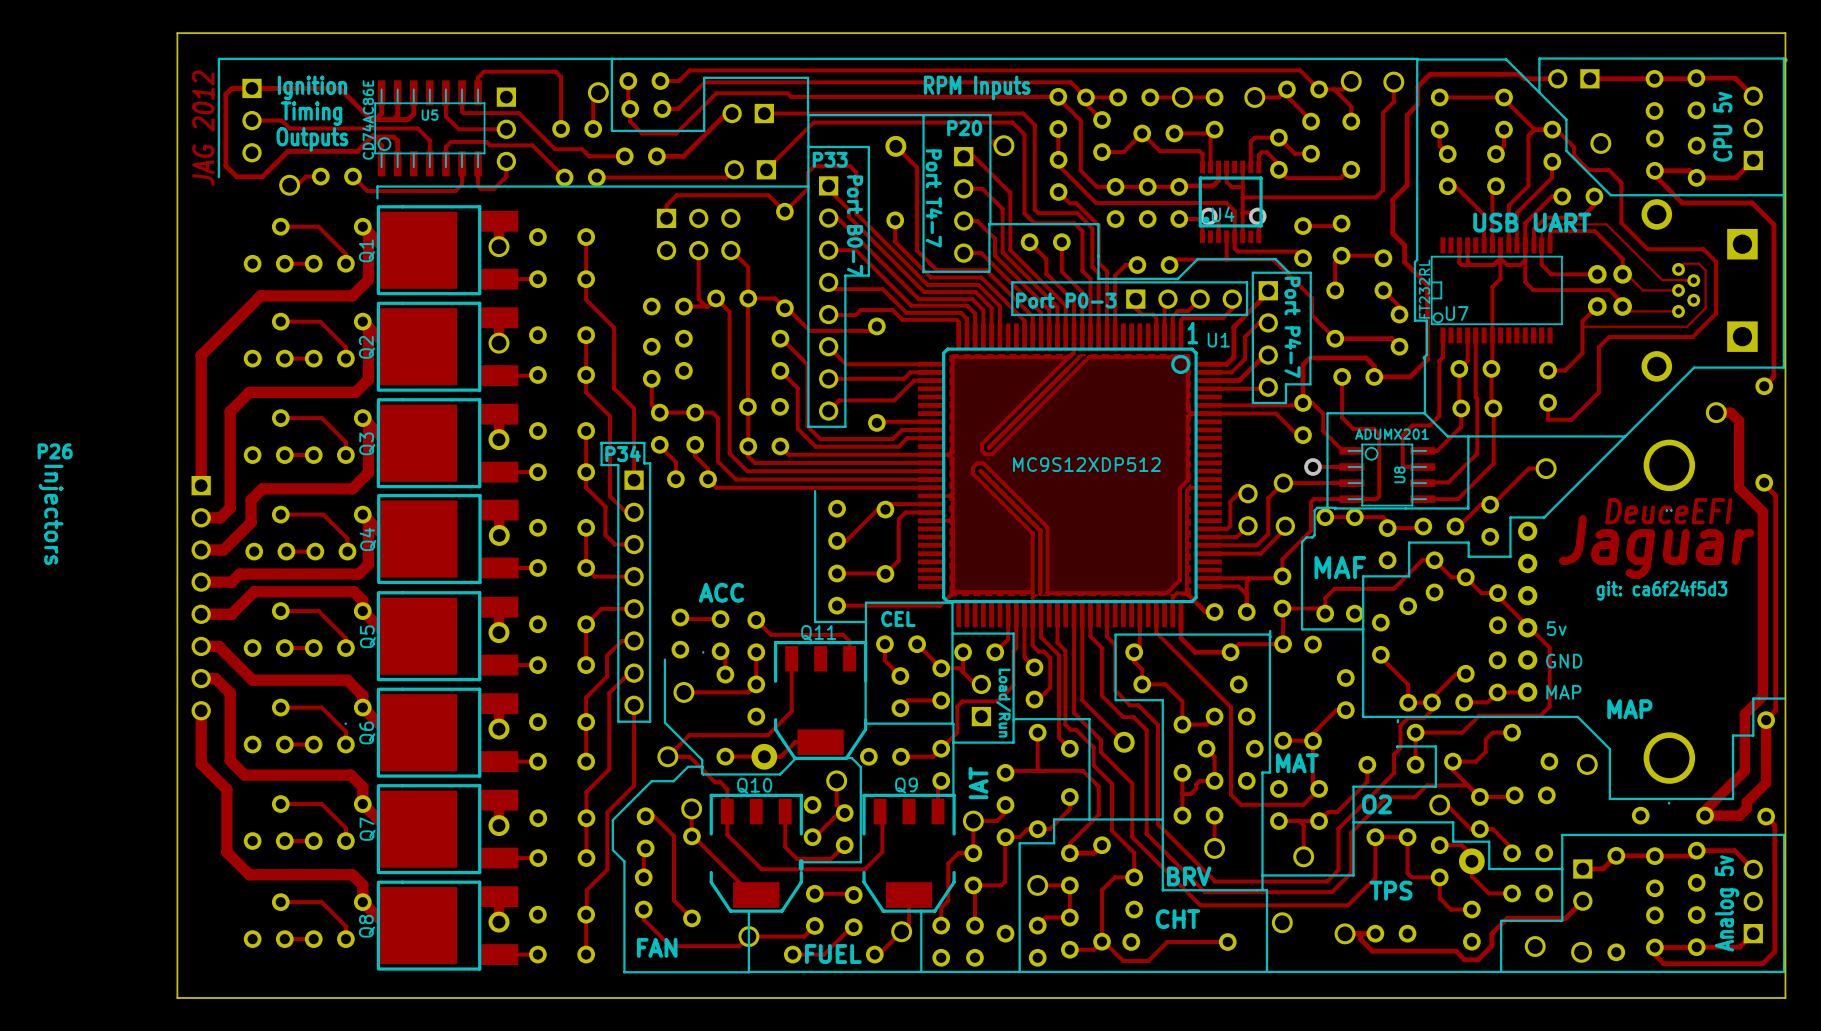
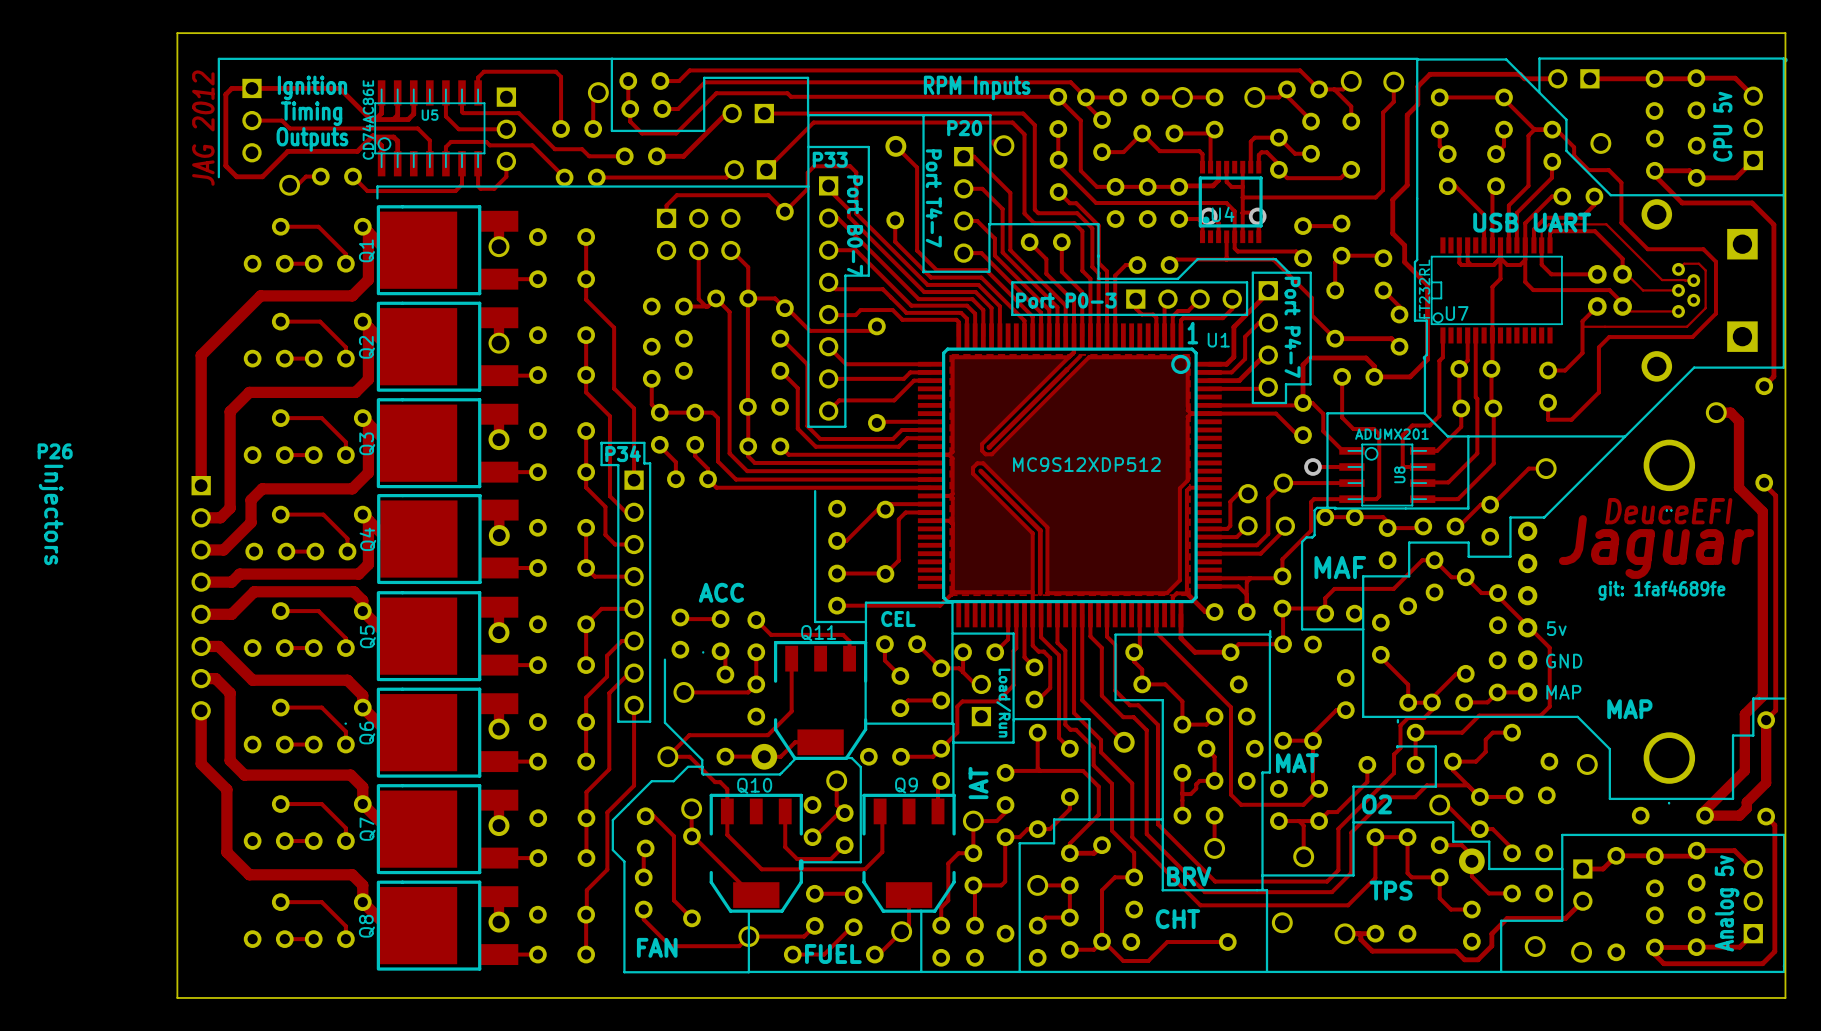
text: git: ca6f24f5d3 (1661, 590) -> git: 1faf4689fe (1661, 590)

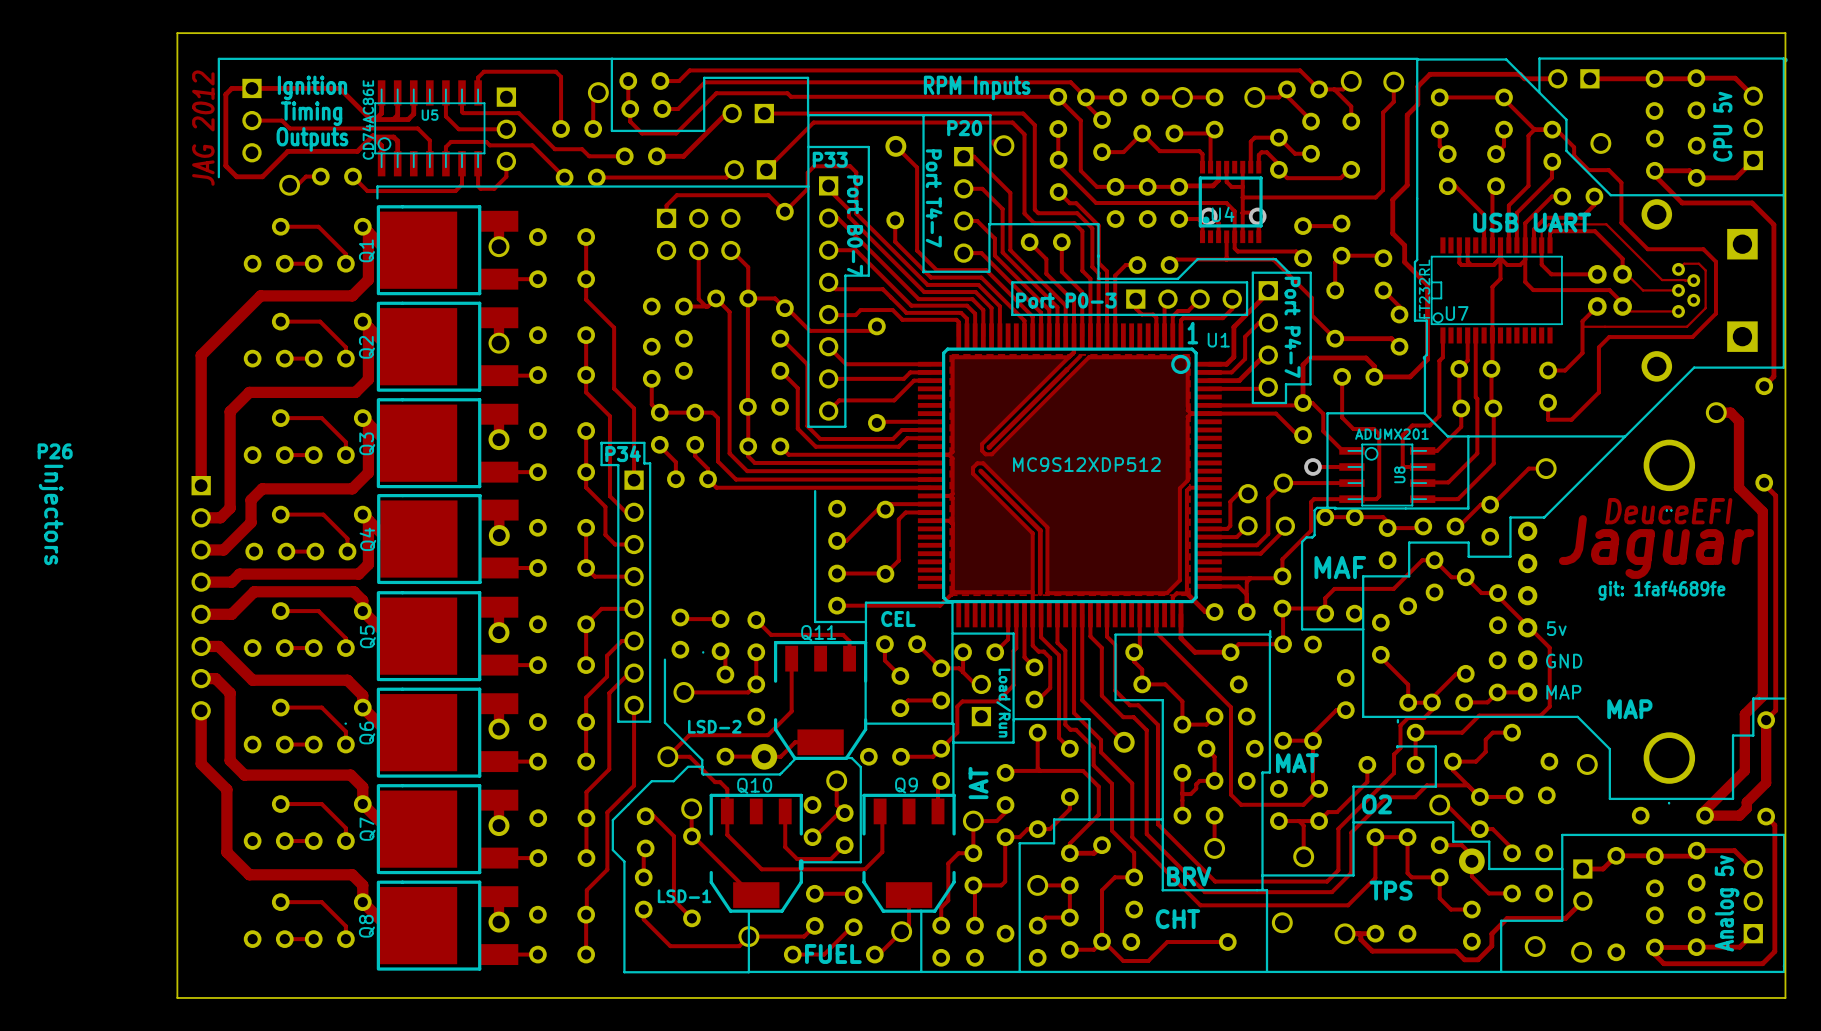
text: ACC (721, 592) -> none
text: none -> LSD-2 (714, 726)
text: none -> LSD-1 (684, 896)
text: FAN (657, 947) -> none

